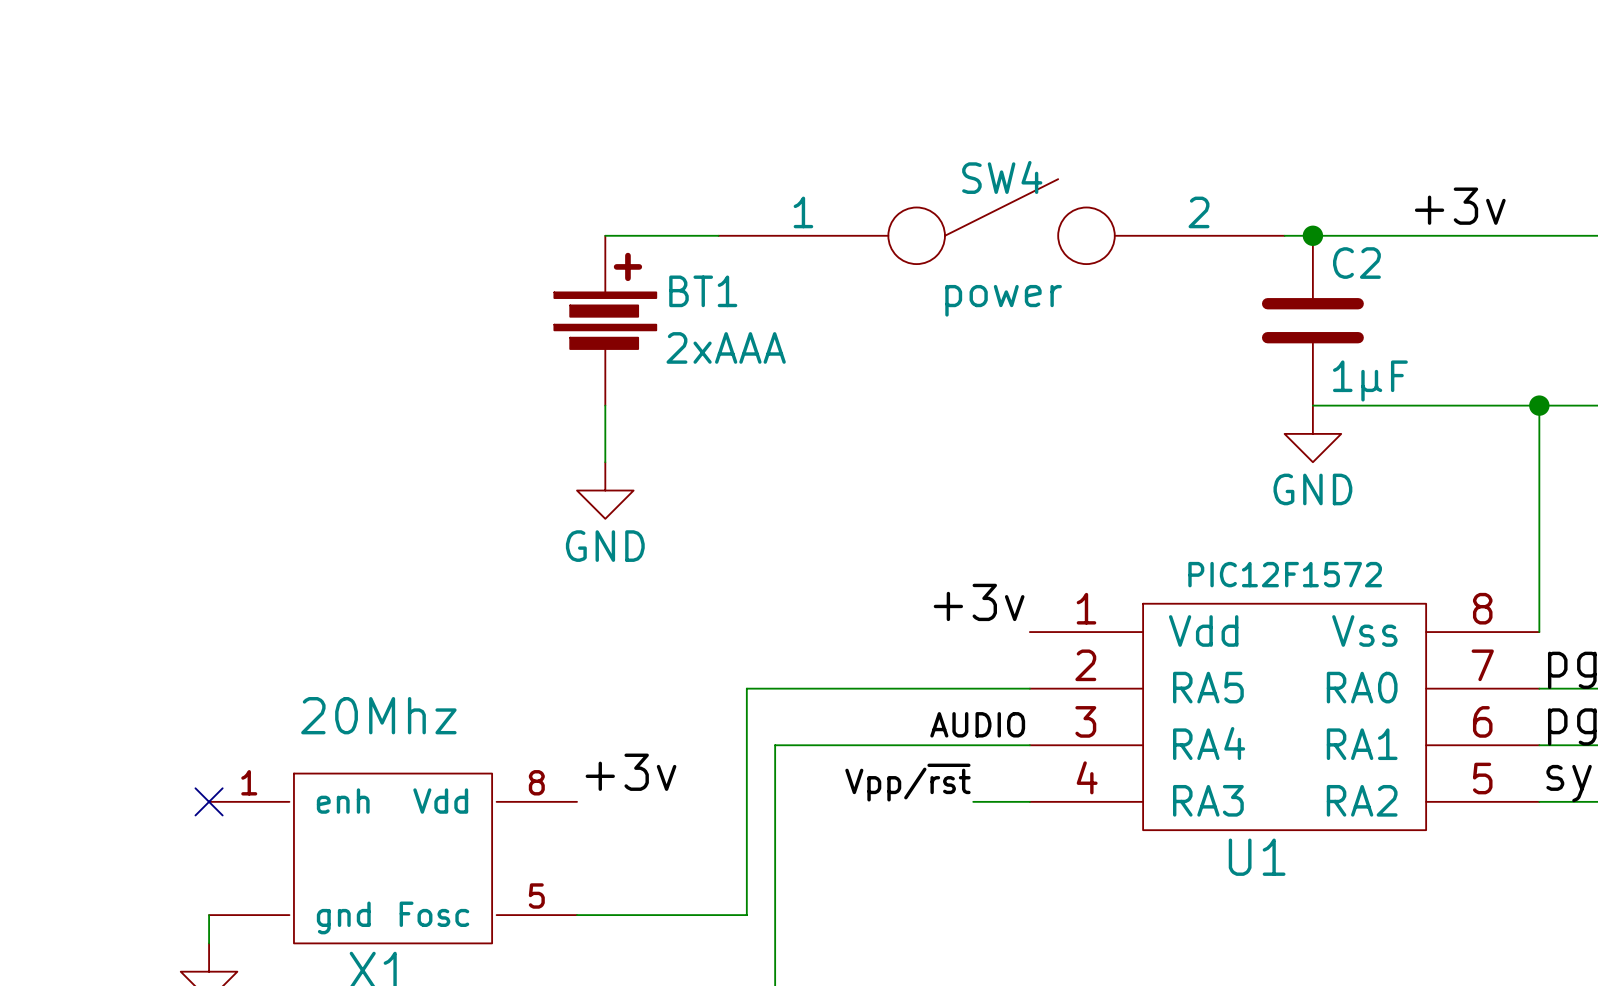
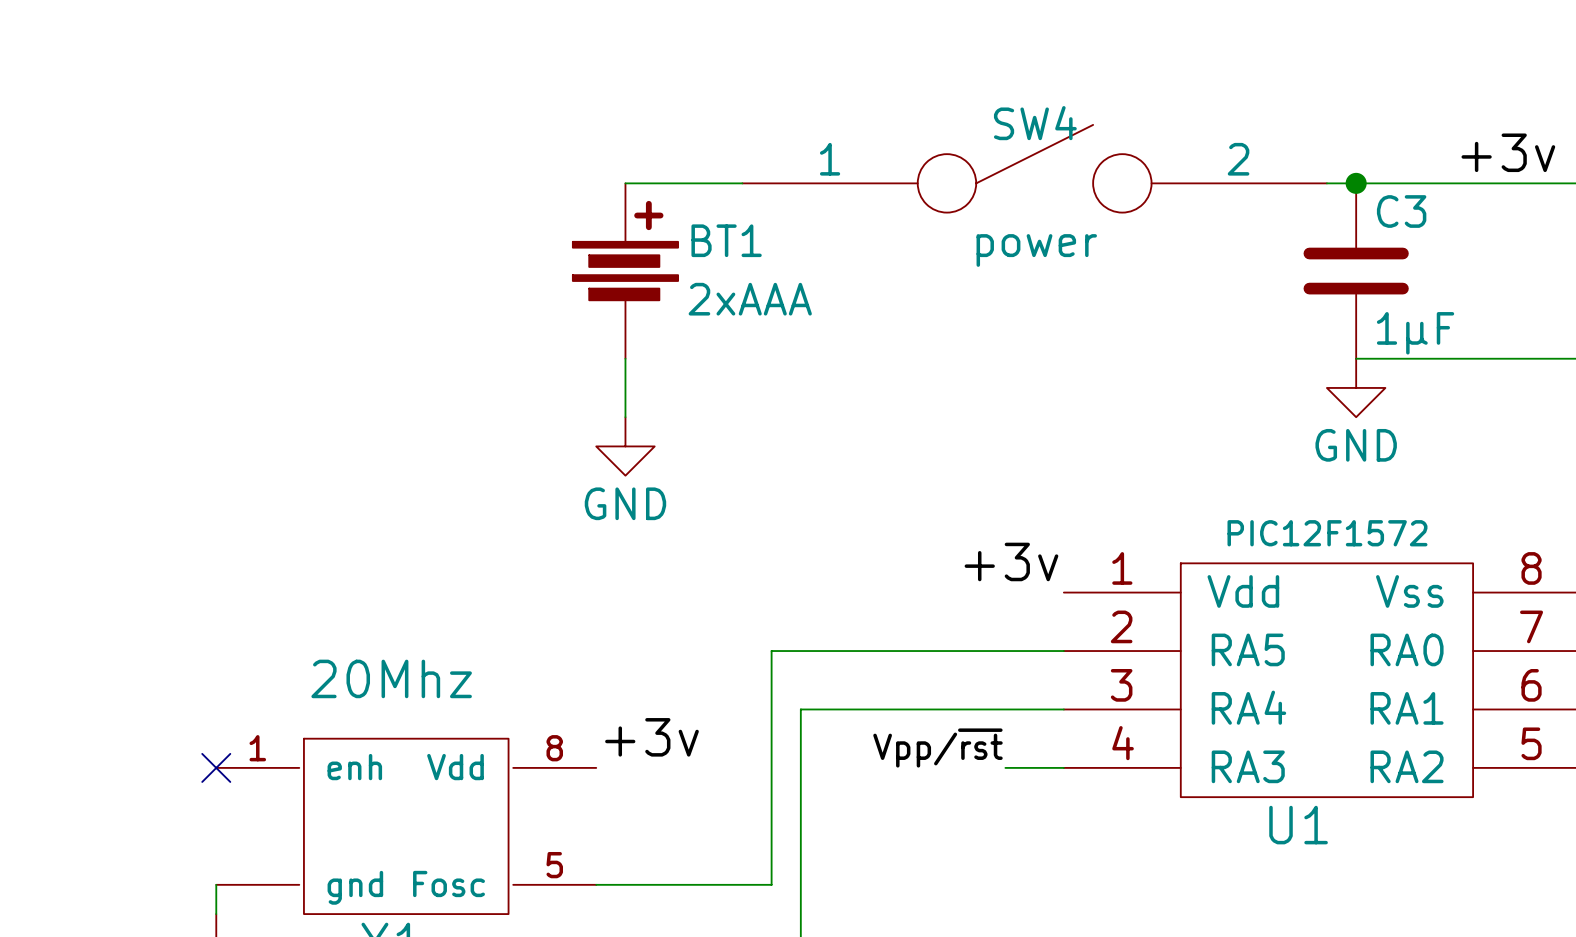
C2 name: C2 (1356, 263) -> C3 (1401, 211)
label: AUDIO (977, 724) -> none

